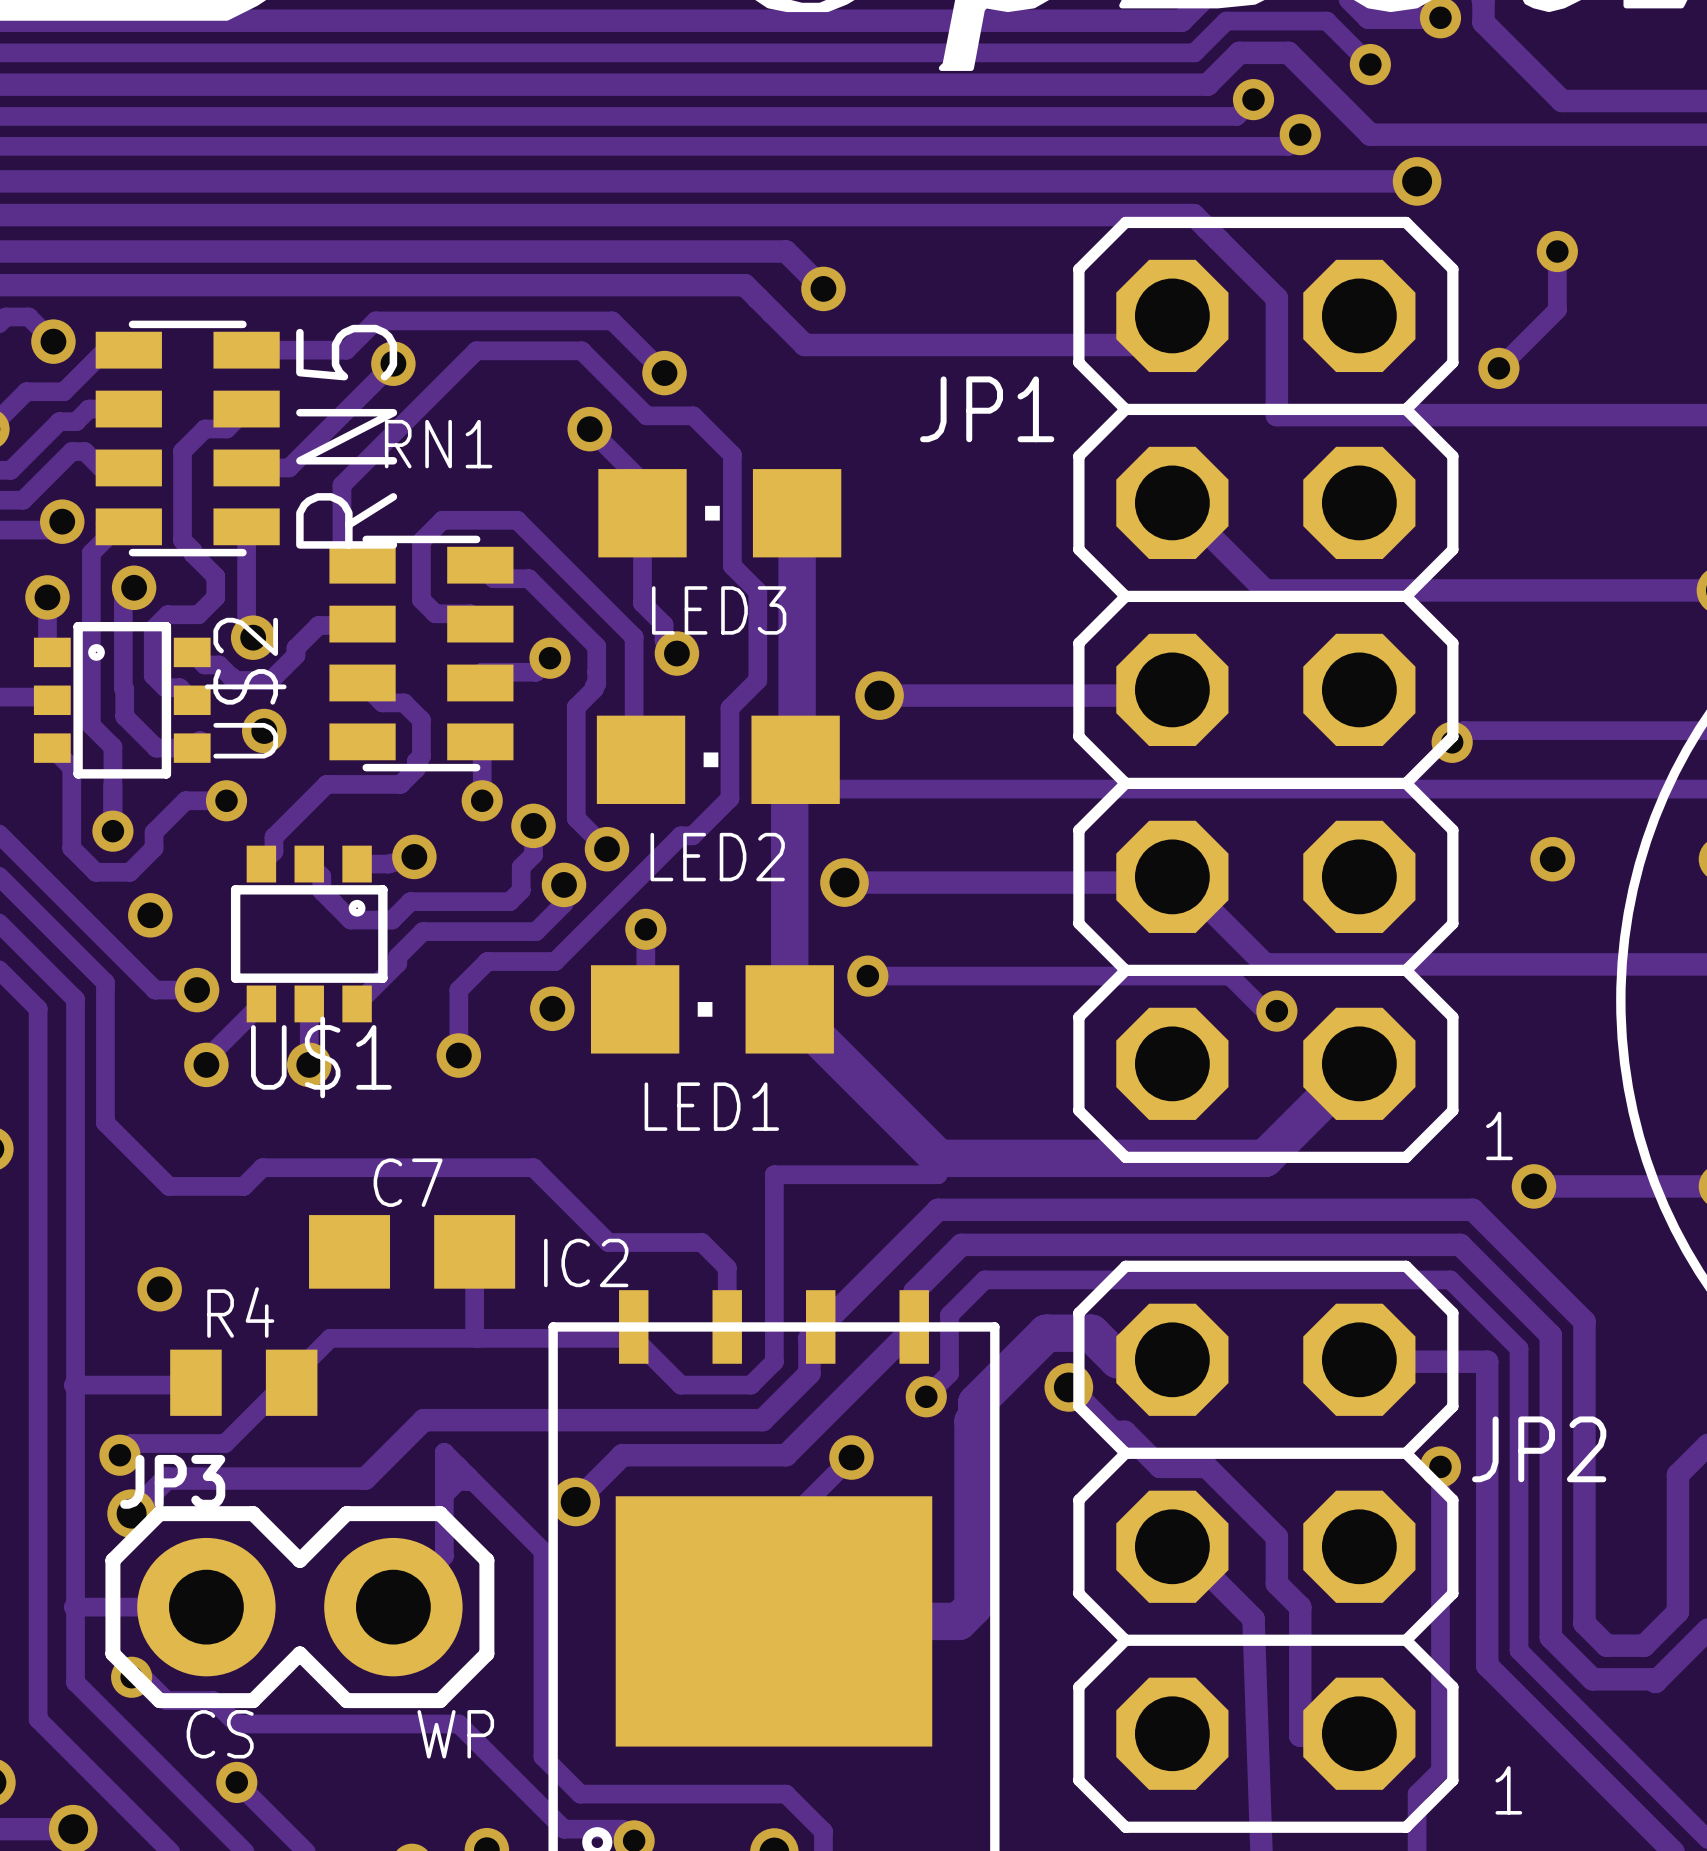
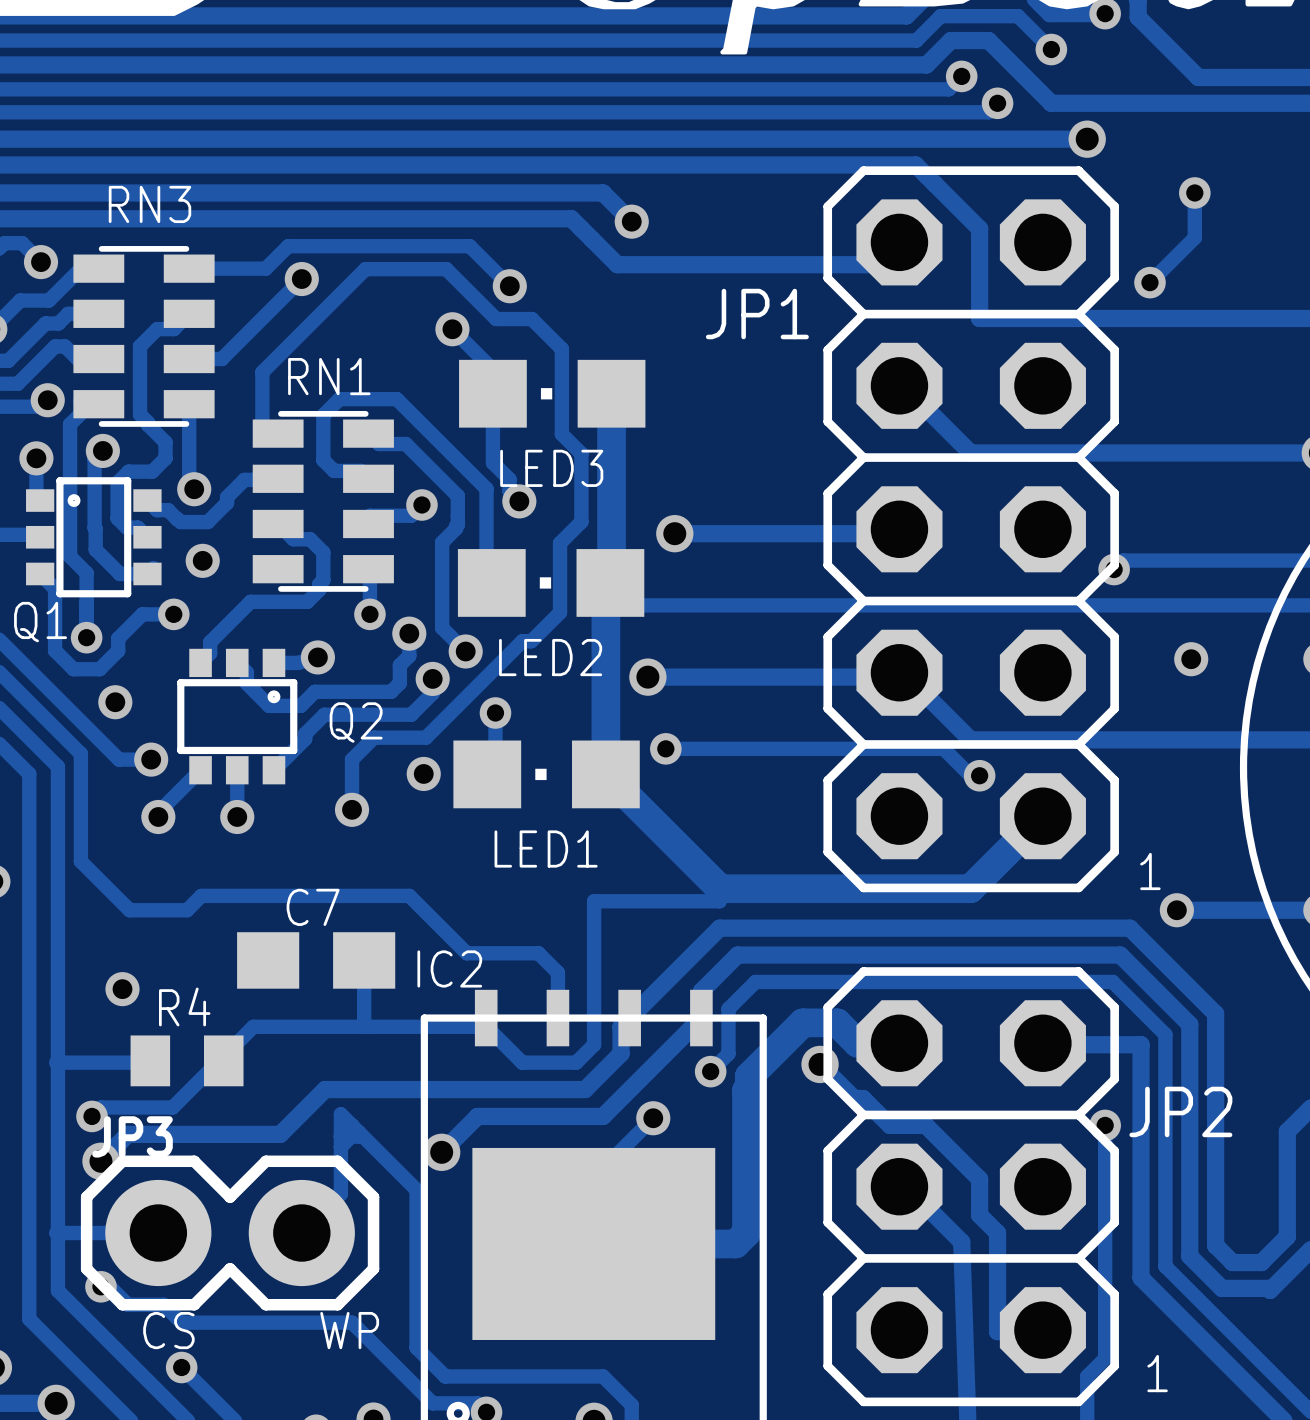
RN5 name: RN5 (346, 436) -> RN3 (150, 204)
RN1 name position: RN1 (438, 444) -> RN1 (329, 376)
U$2 name: U$2 (245, 688) -> Q1 (40, 622)
U$1 name: U$1 (321, 1057) -> Q2 (356, 722)

